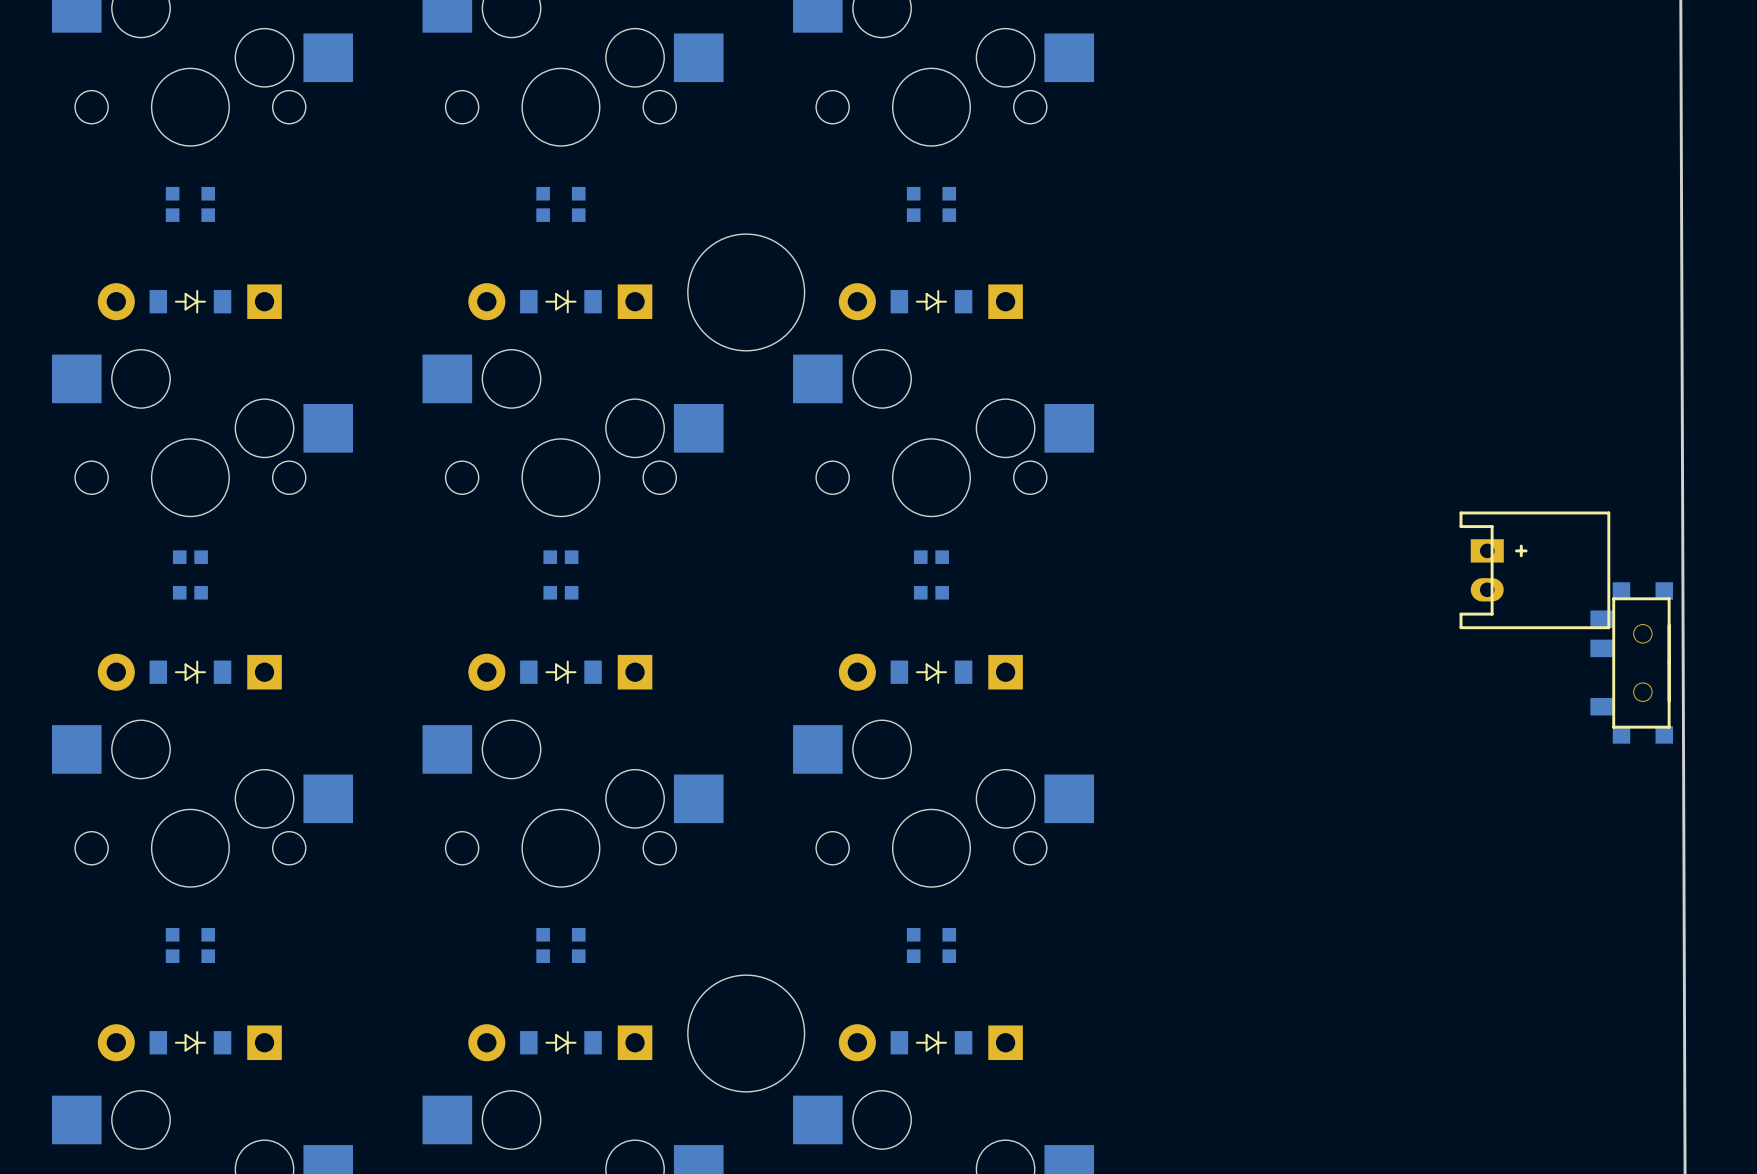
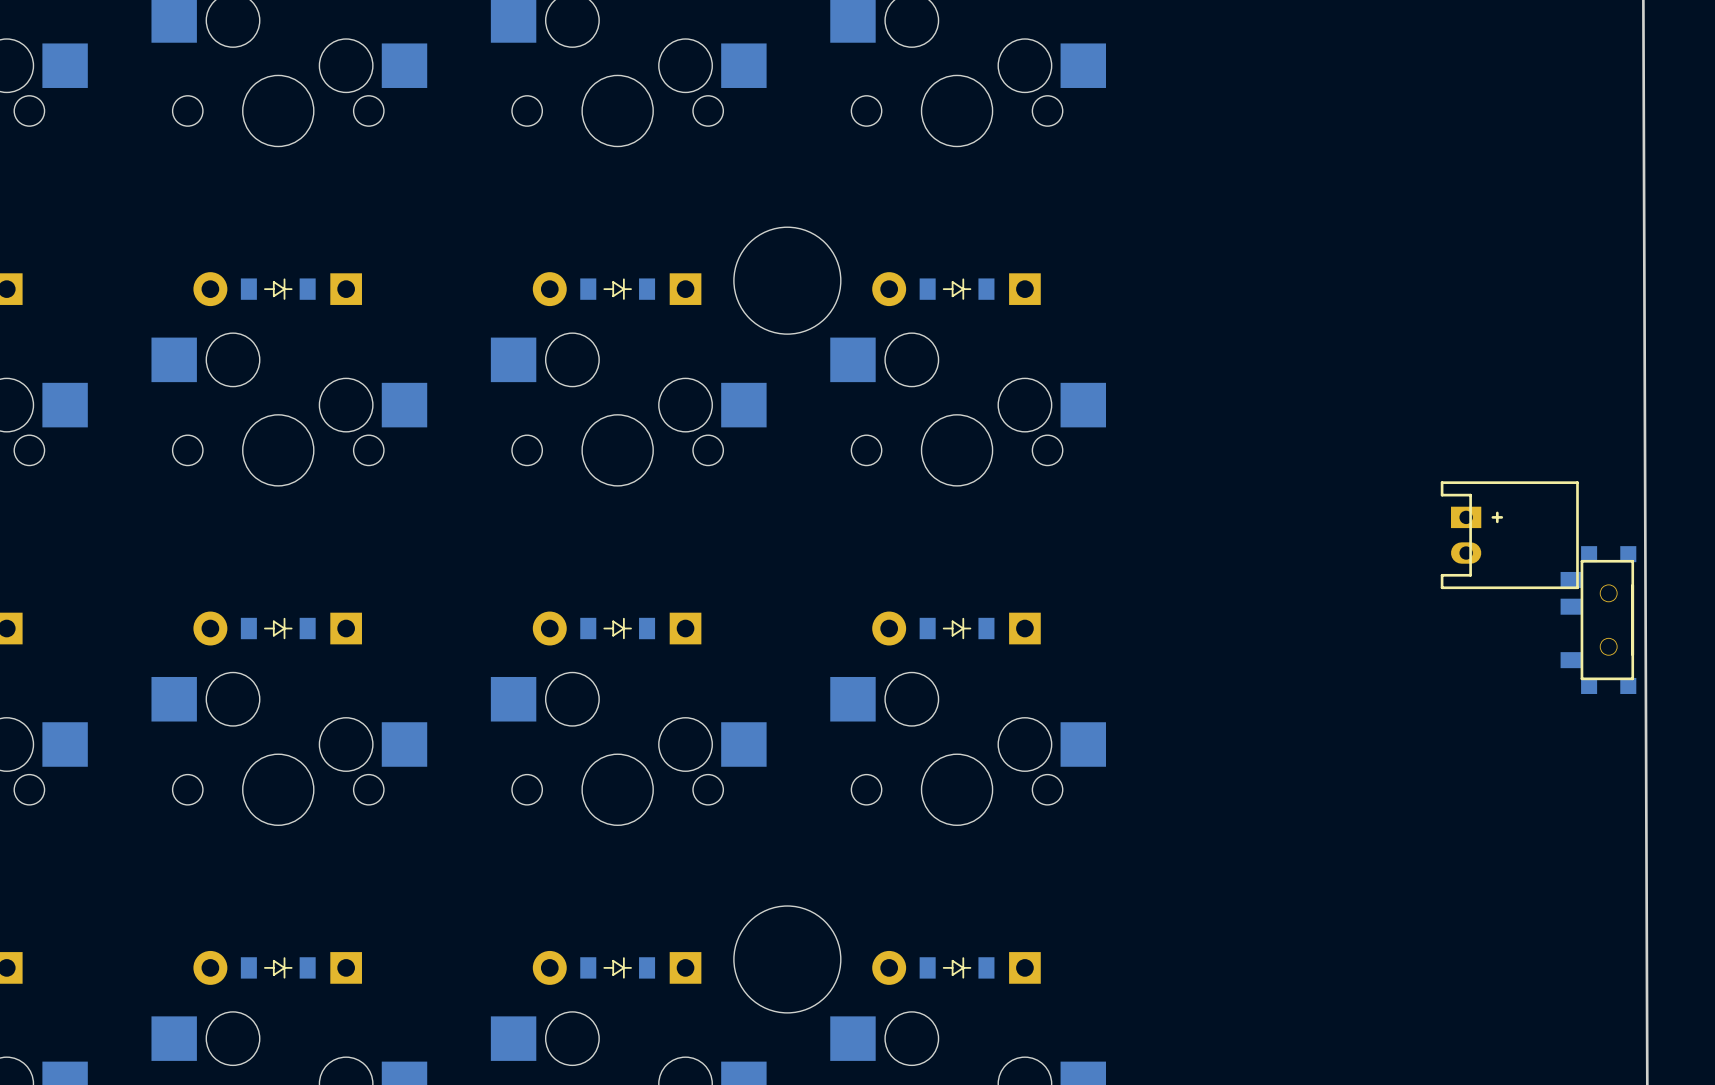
part: (190, 204) -> none
part: (560, 204) -> none
part: (931, 204) -> none
part: (190, 574) -> none
part: (560, 574) -> none
part: (931, 574) -> none
part: (190, 945) -> none
part: (560, 945) -> none
part: (931, 945) -> none

